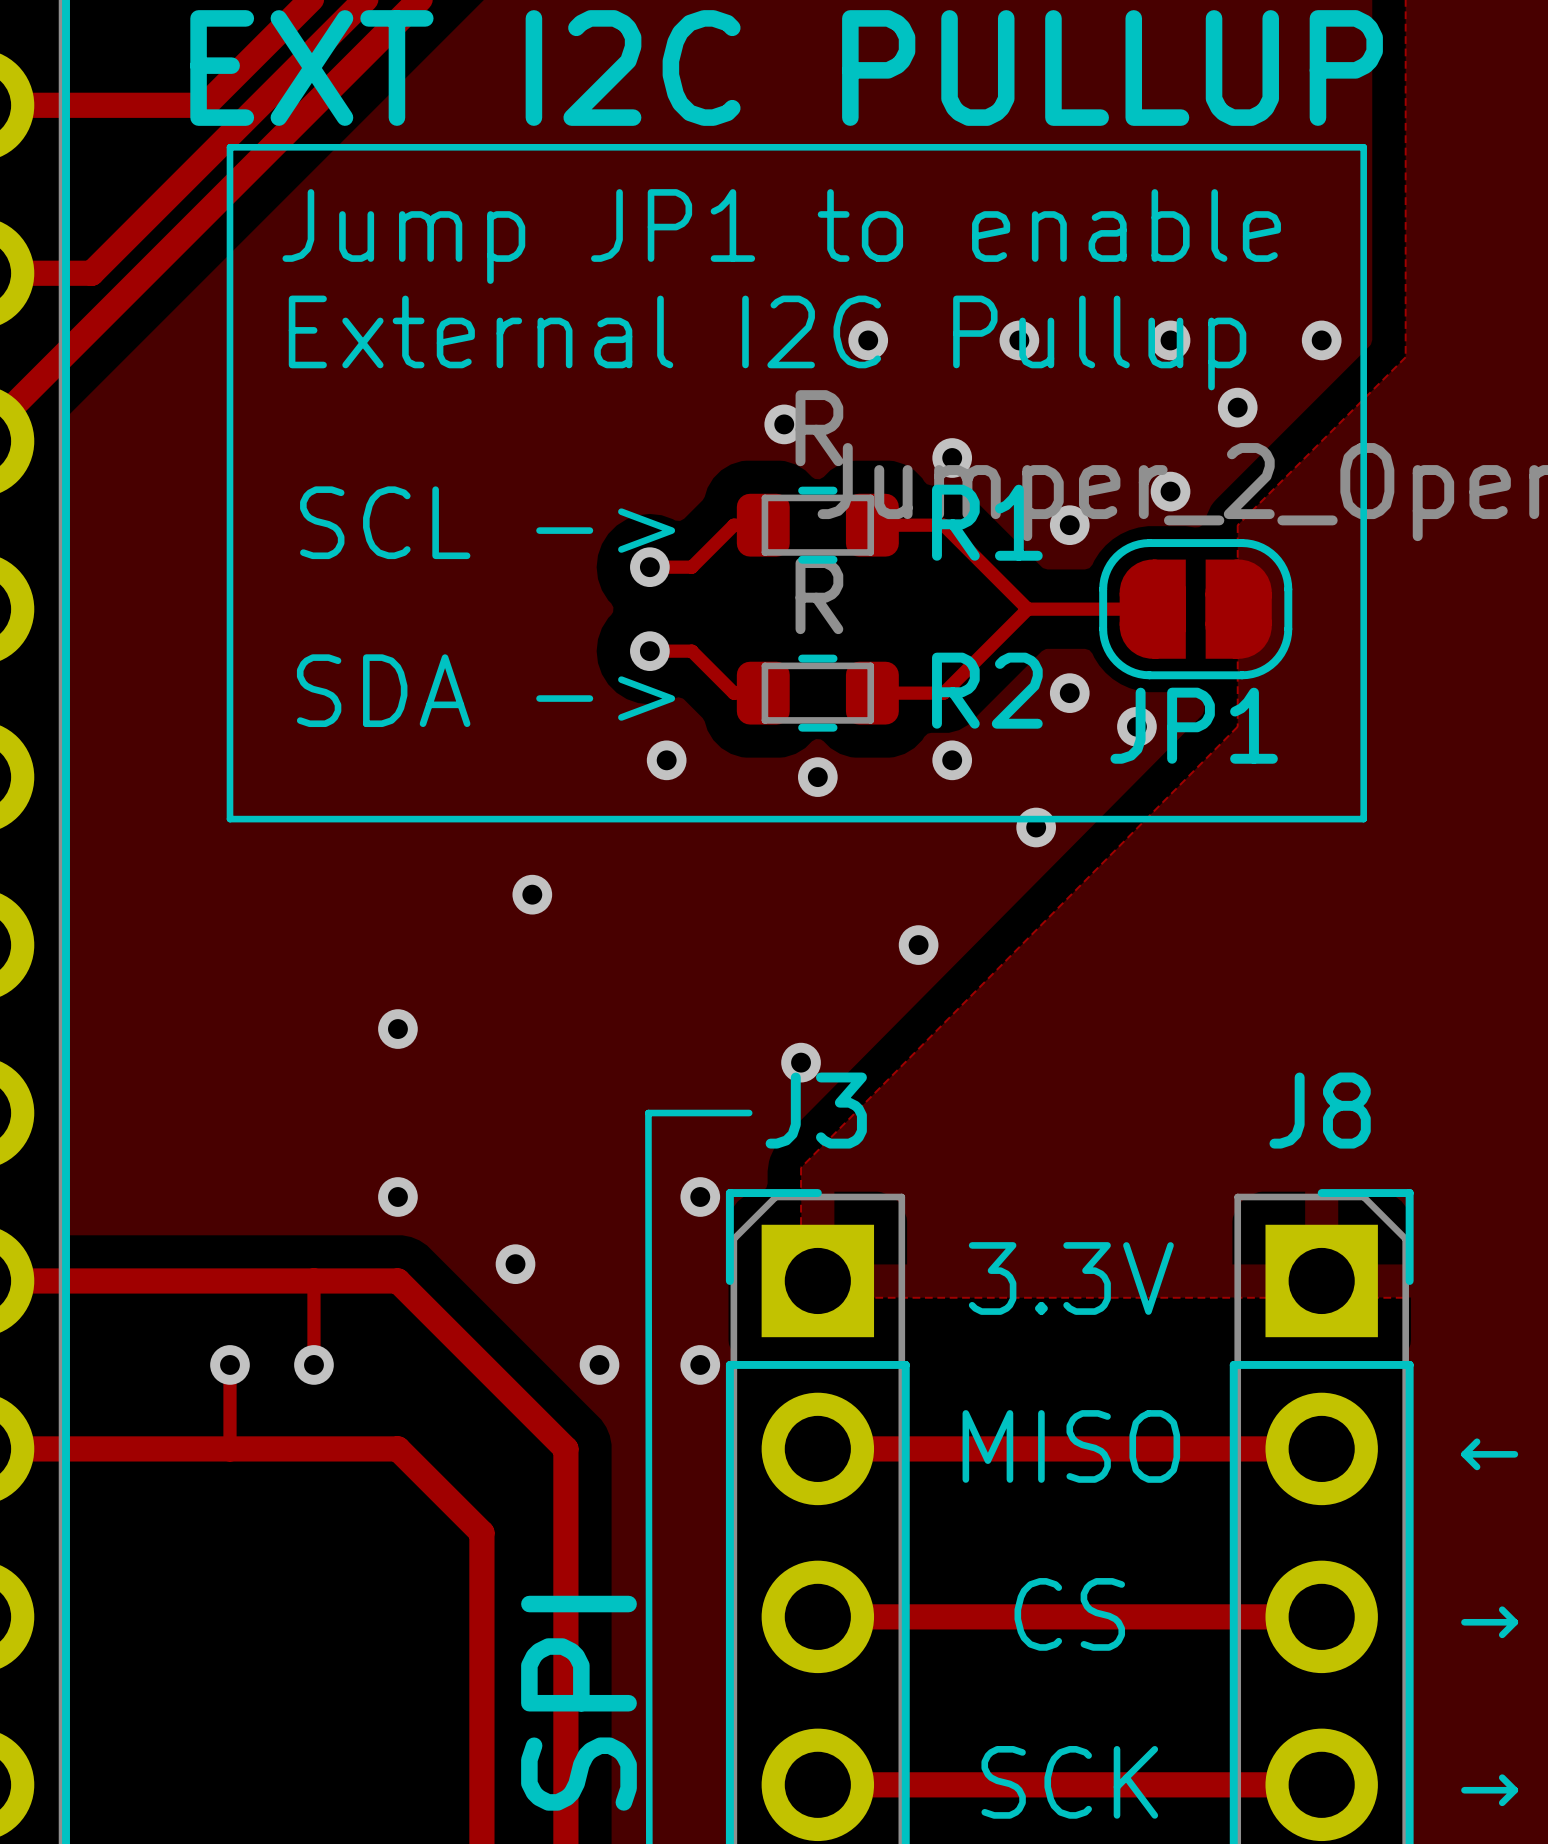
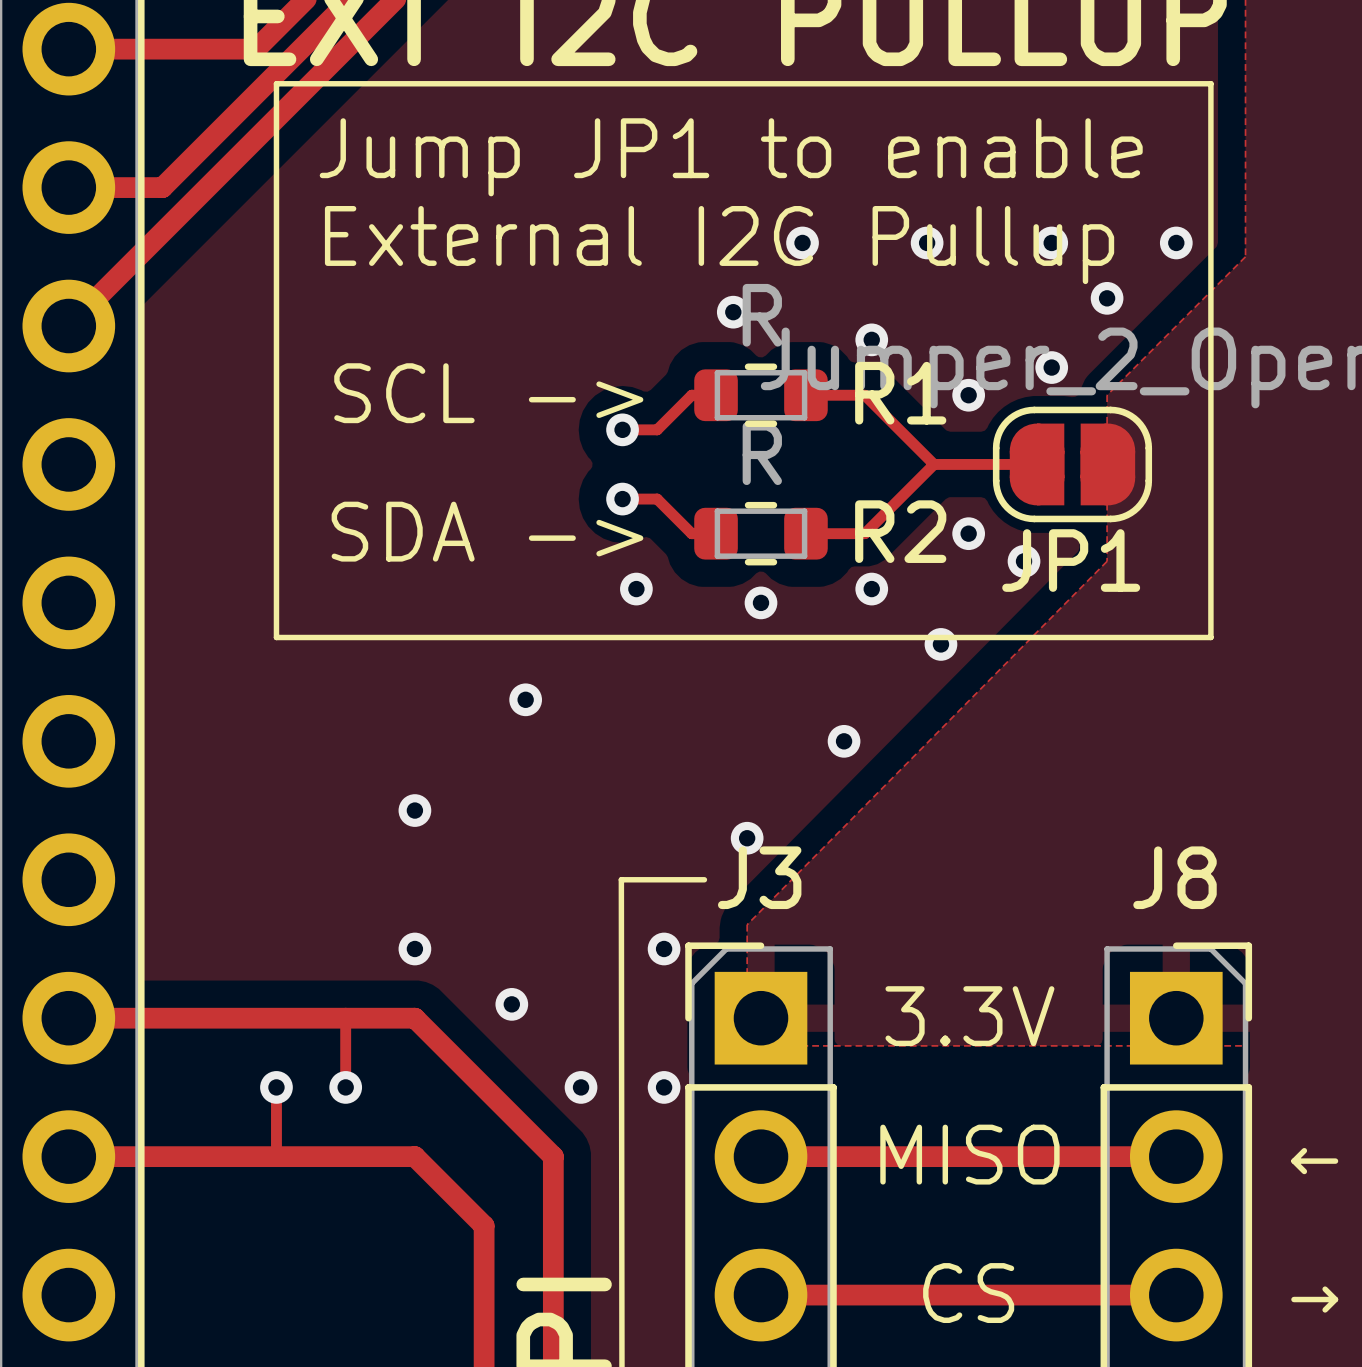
zone outline: (801, 1297) (1405, 1297) (1405, 1314) -> (747, 1032) (747, 1045) (1245, 1045)

